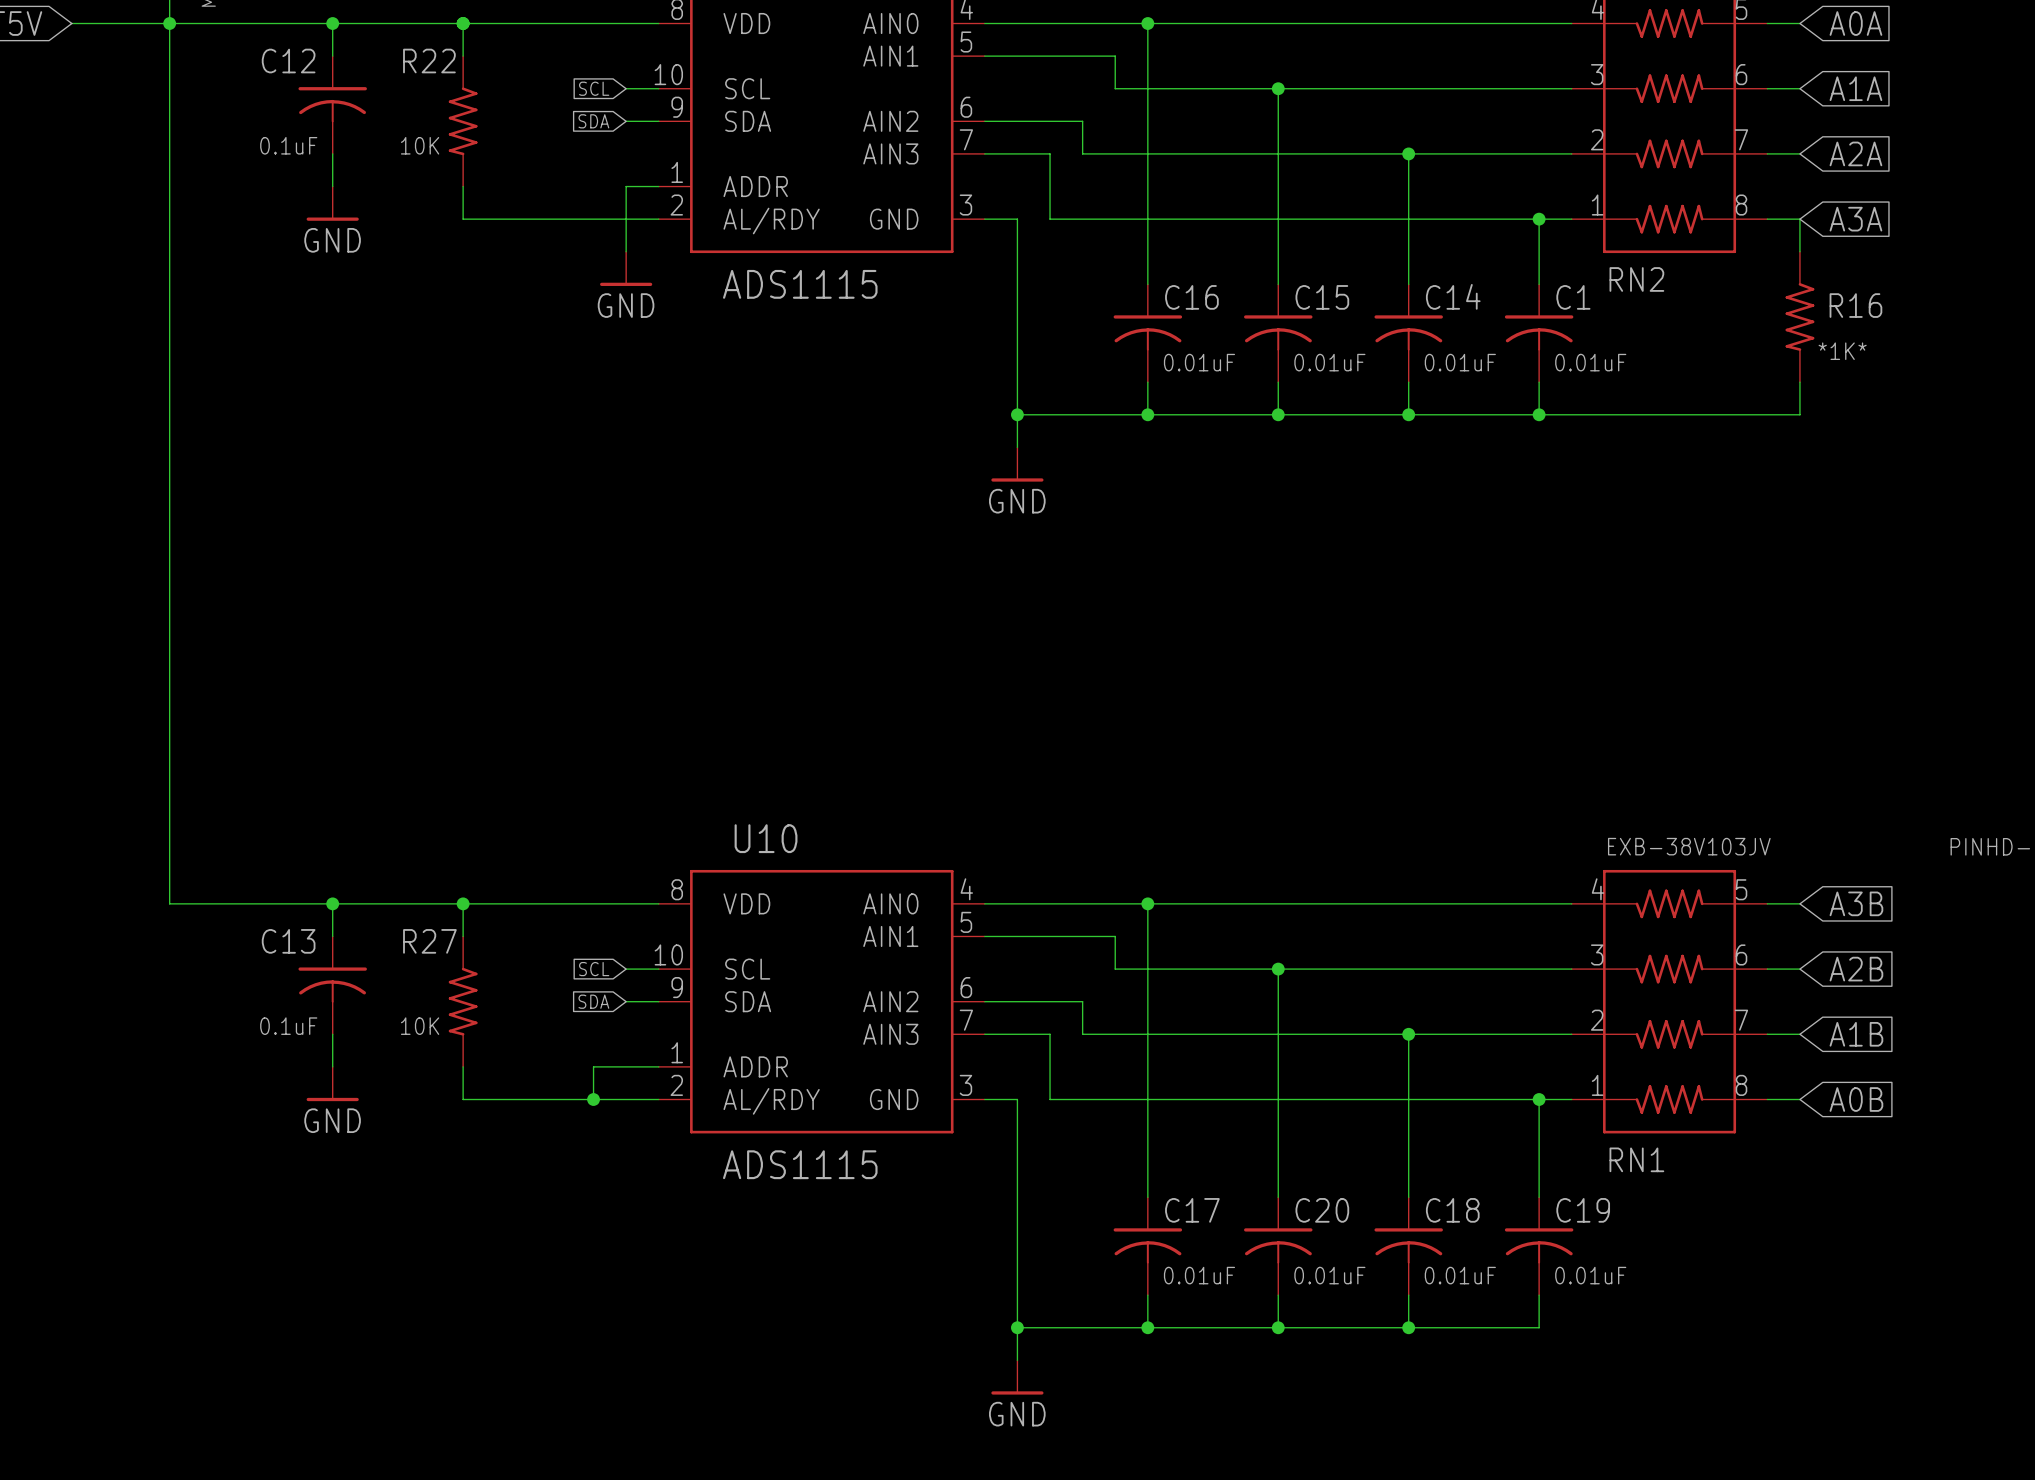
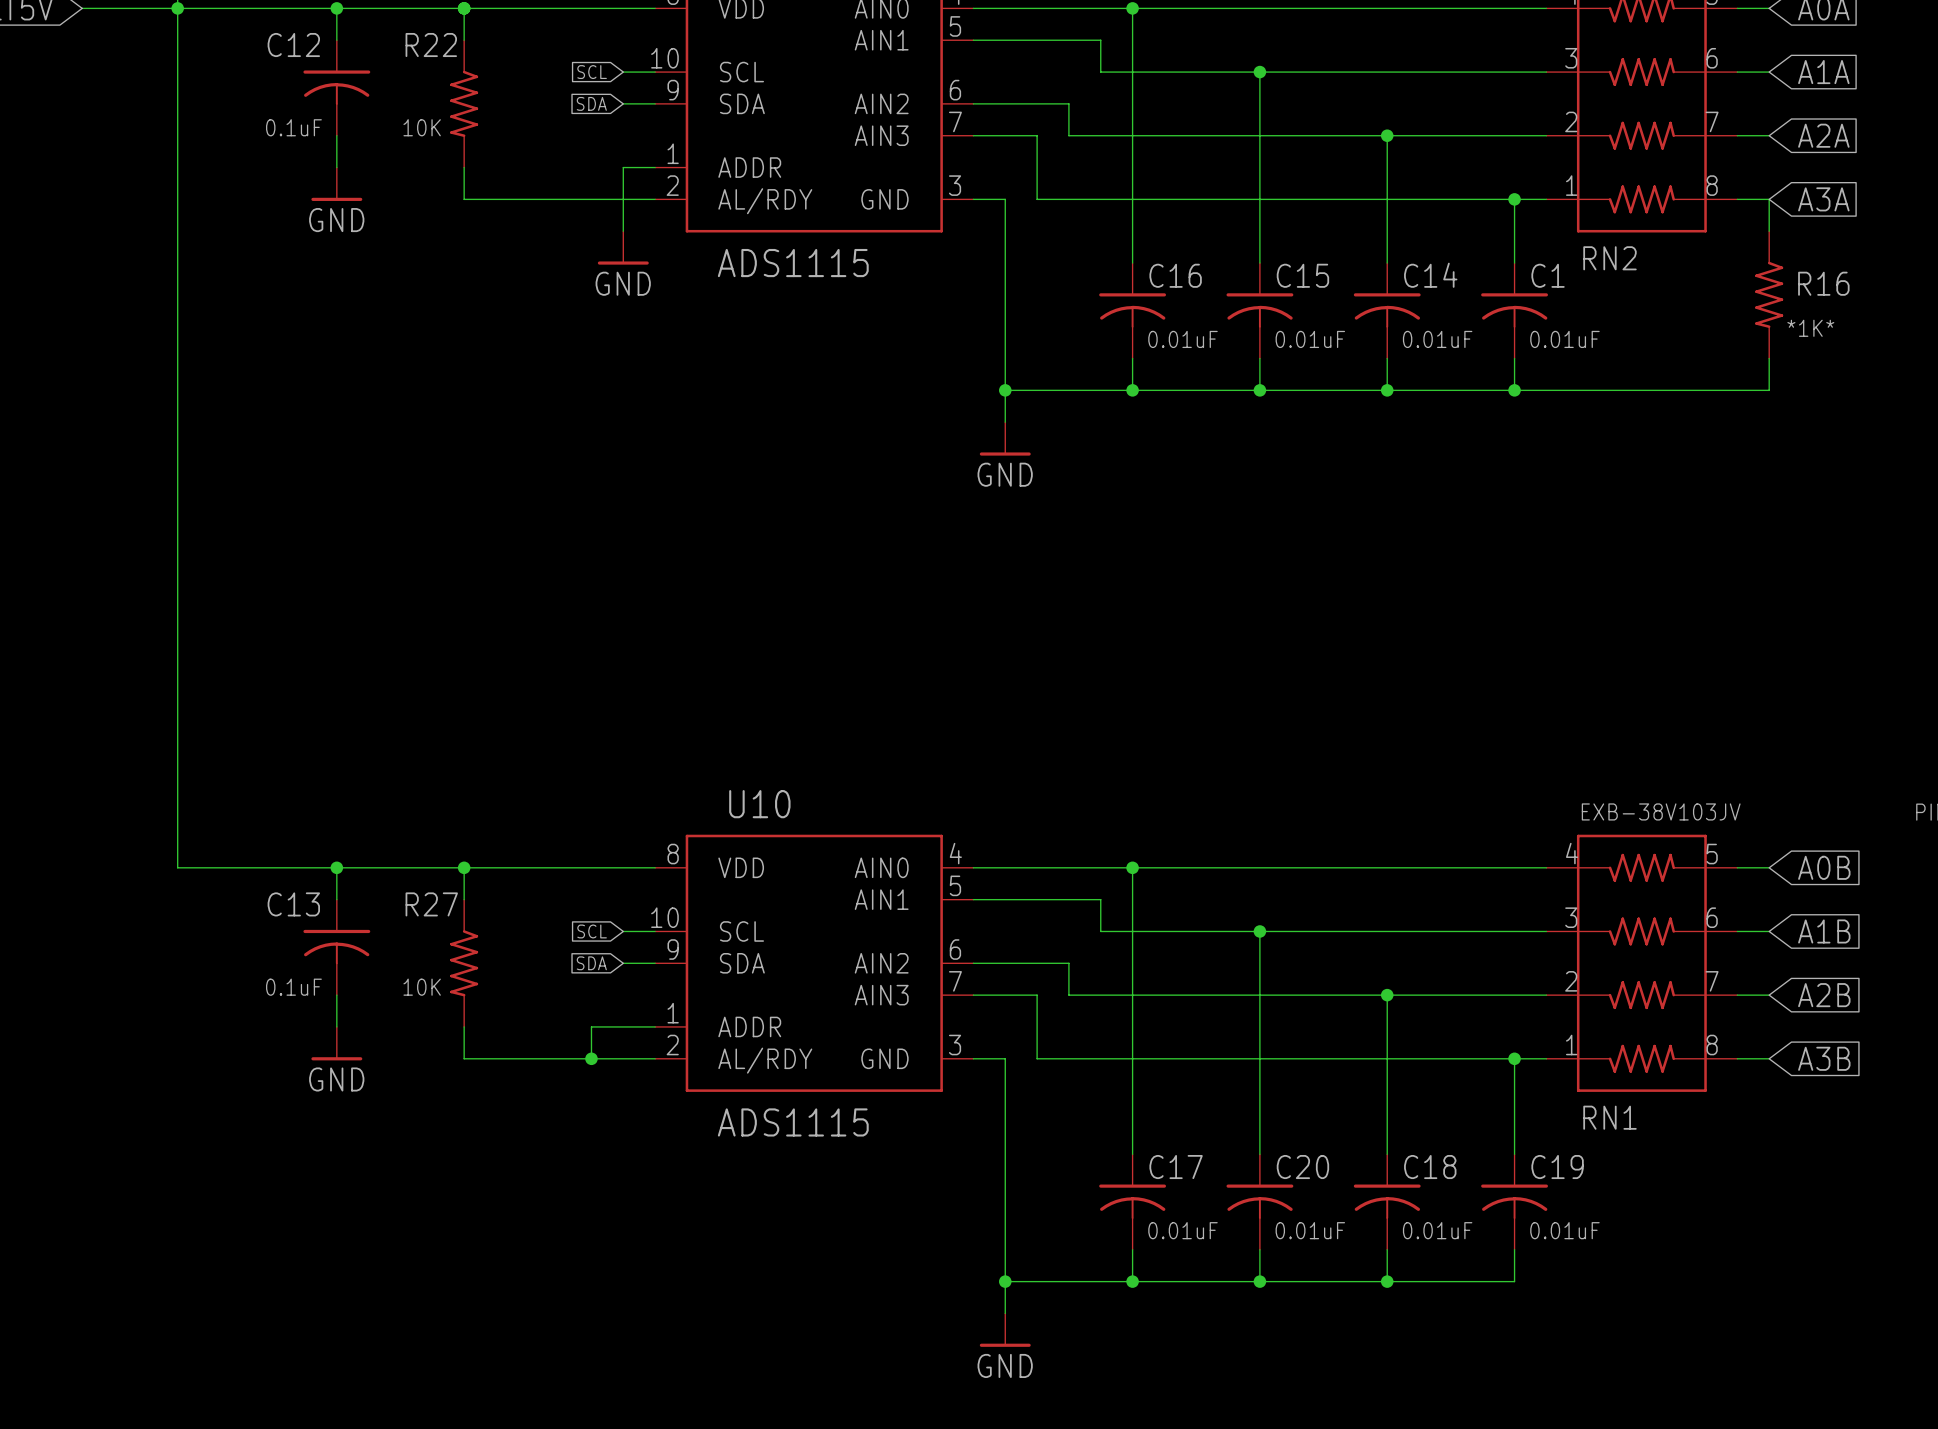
global label: A3B (1856, 903) -> A0B (1824, 867)
global label: A2B (1856, 969) -> A1B (1824, 931)
global label: A1B (1856, 1034) -> A2B (1824, 995)
global label: A0B (1856, 1099) -> A3B (1824, 1058)

